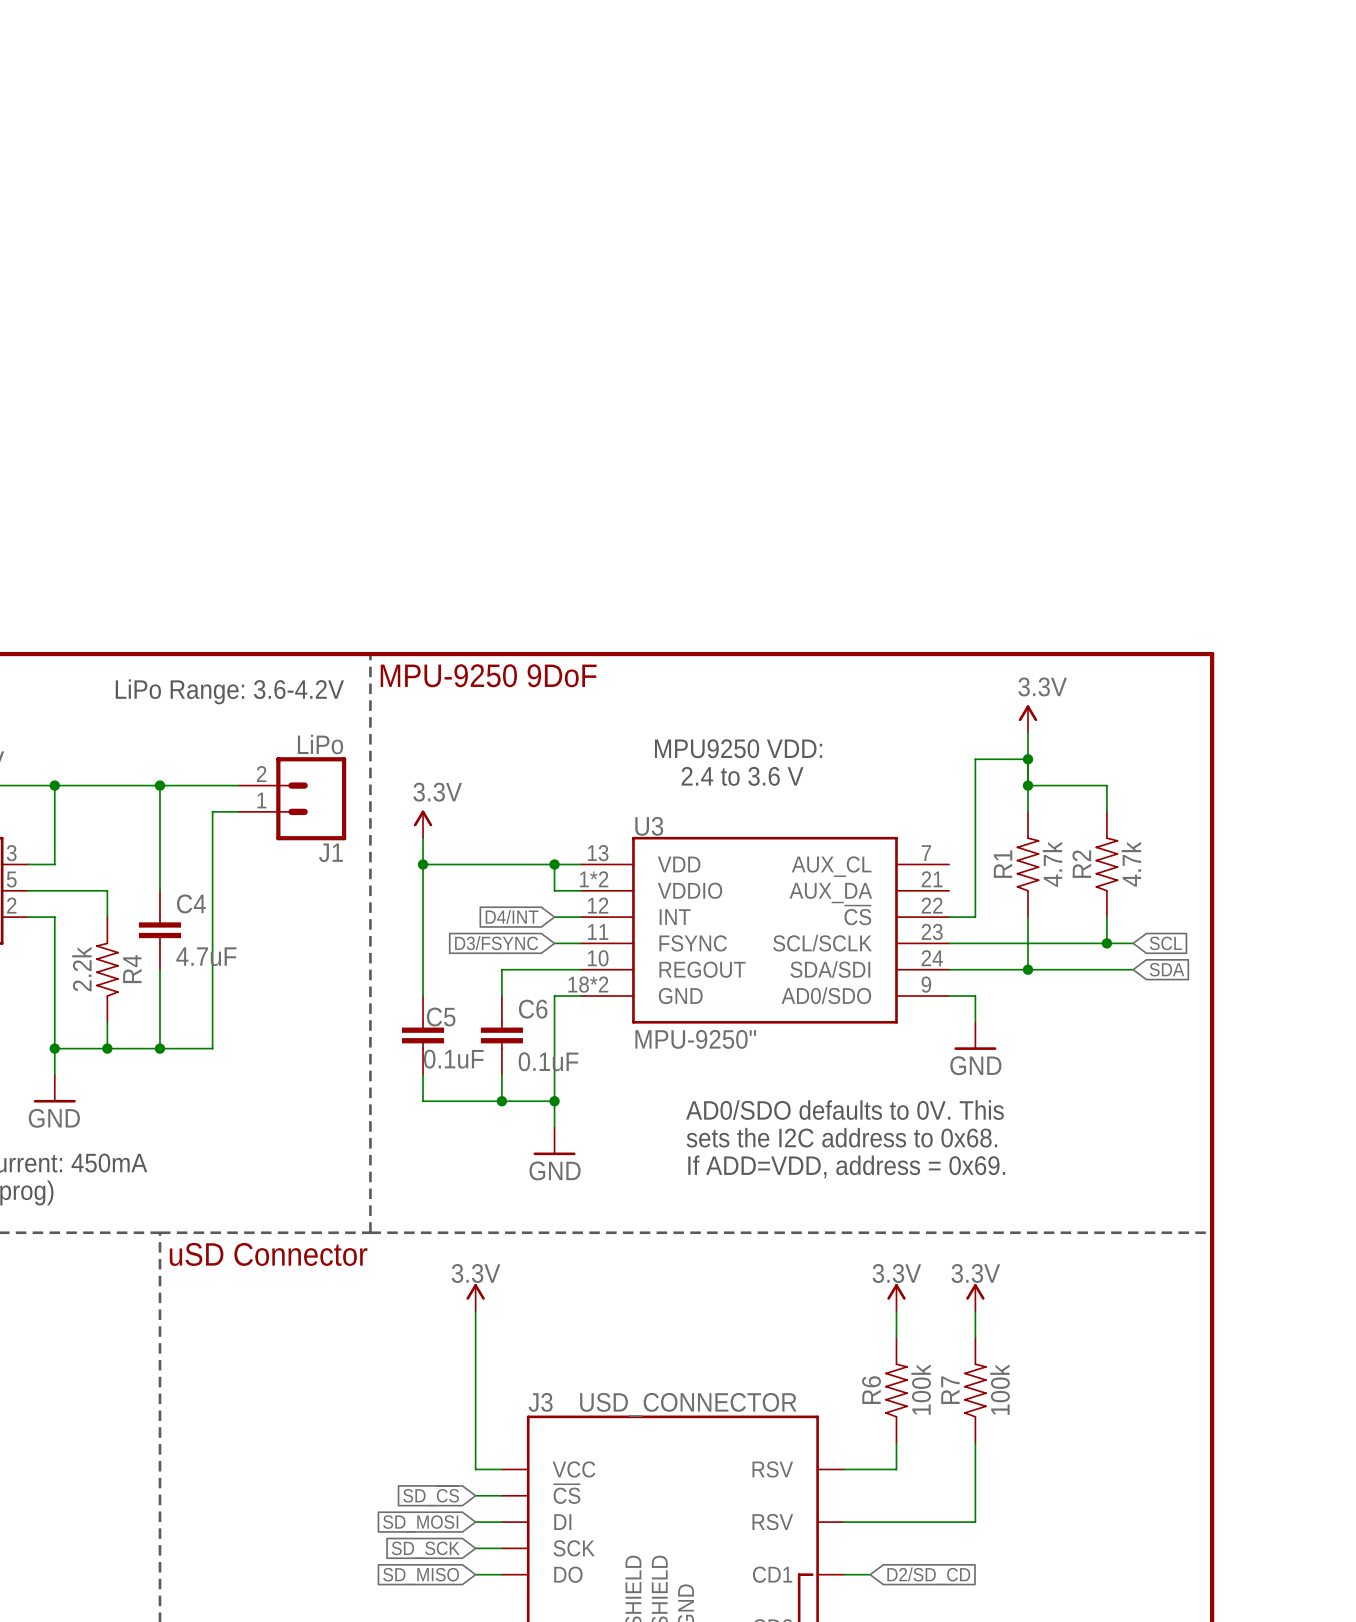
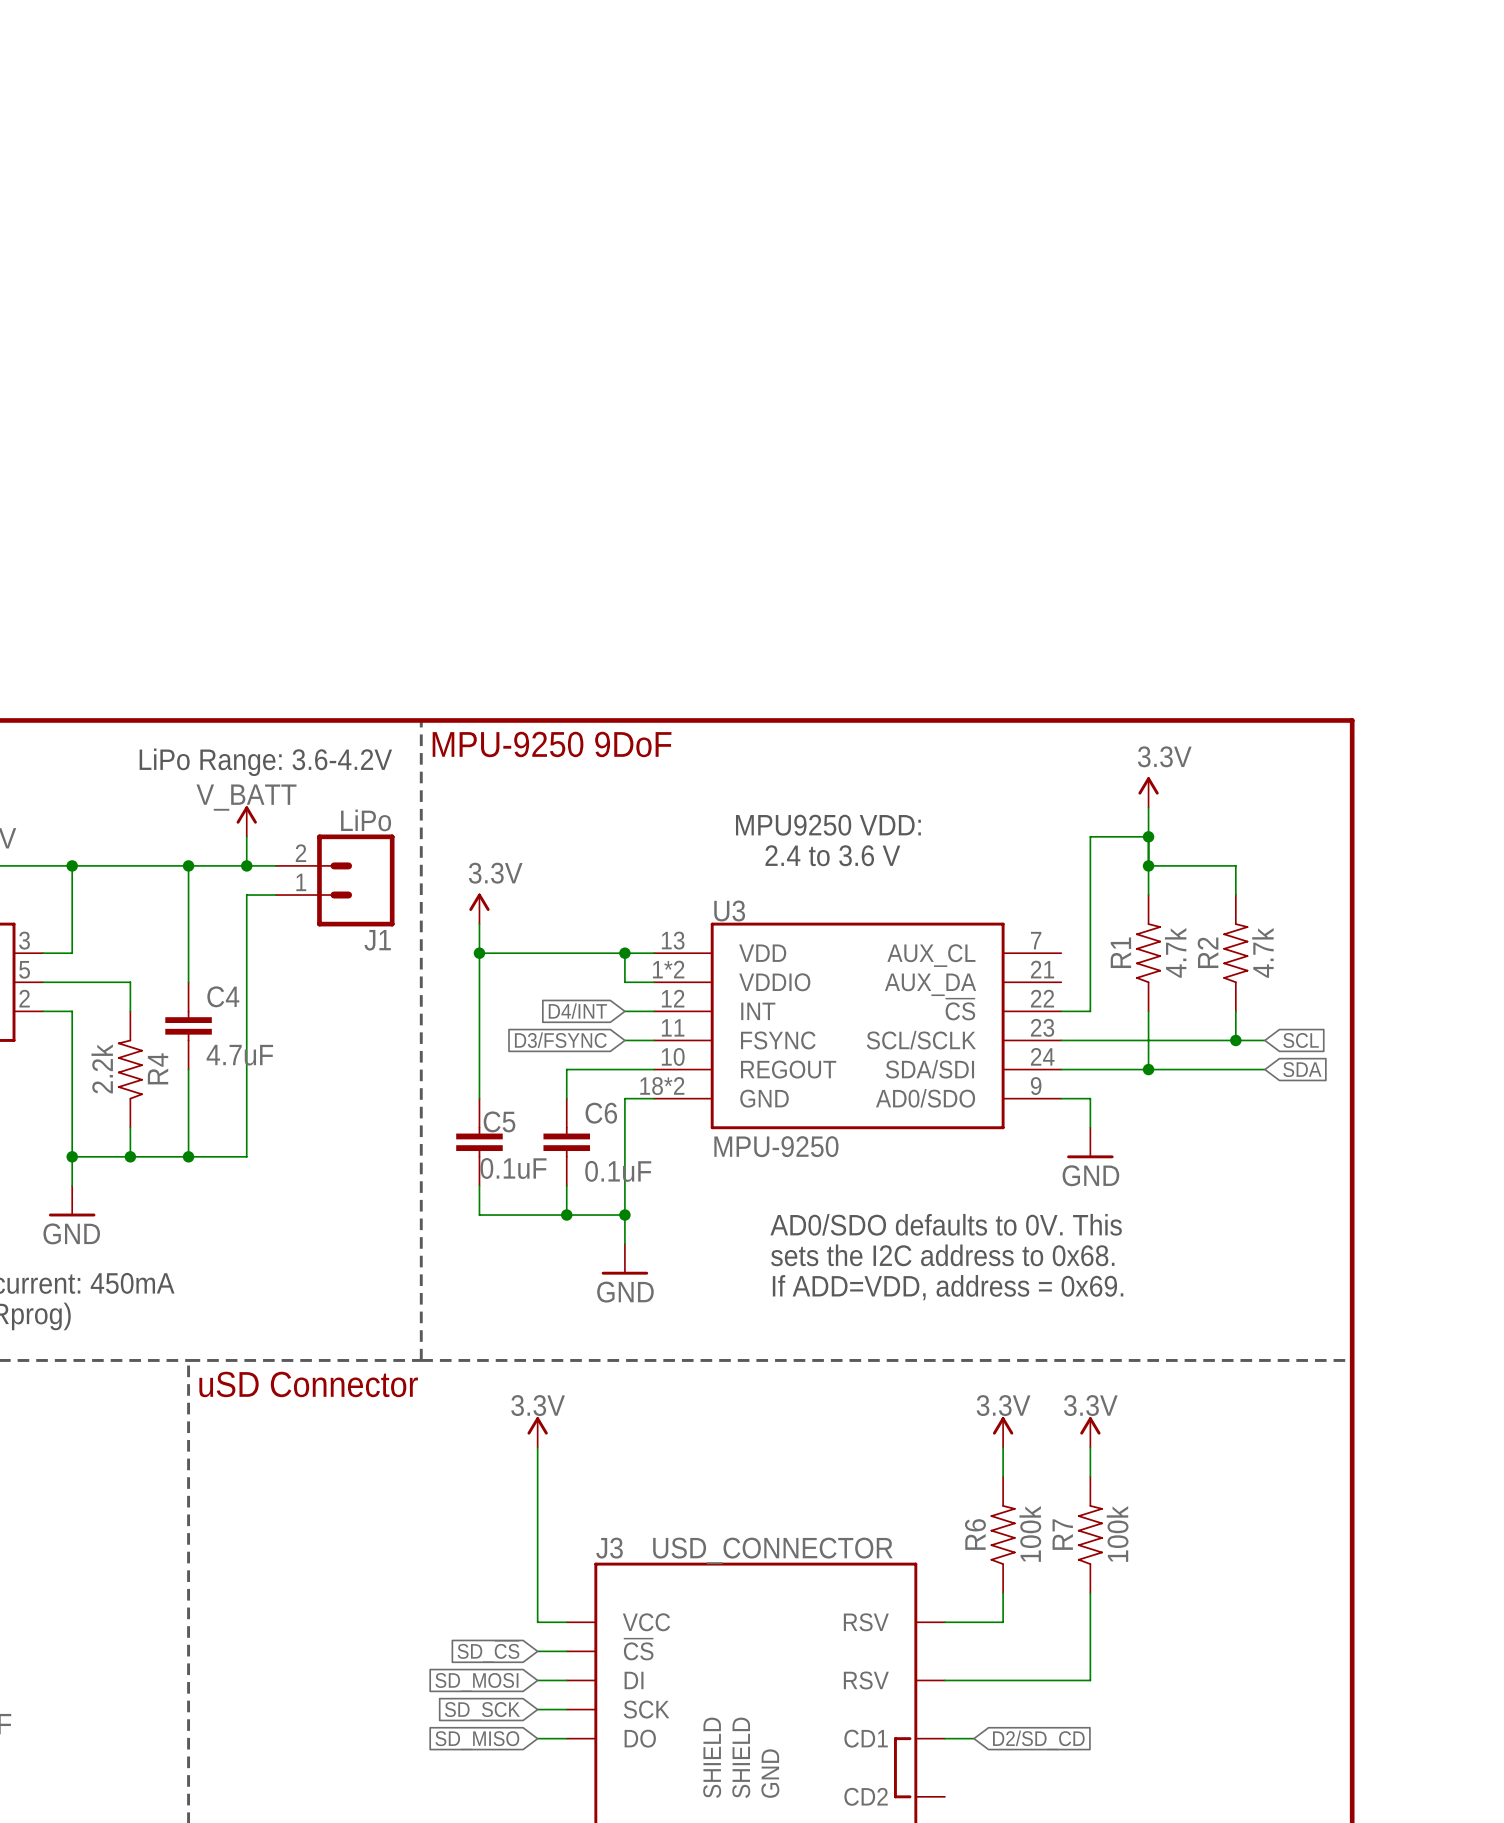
power symbol: none -> V_BATT (246, 821)
wire: none -> (246, 836) (246, 865)
junction: none -> (246, 865)
U3 value: MPU-9250" (695, 1039) -> MPU-9250 (776, 1146)

